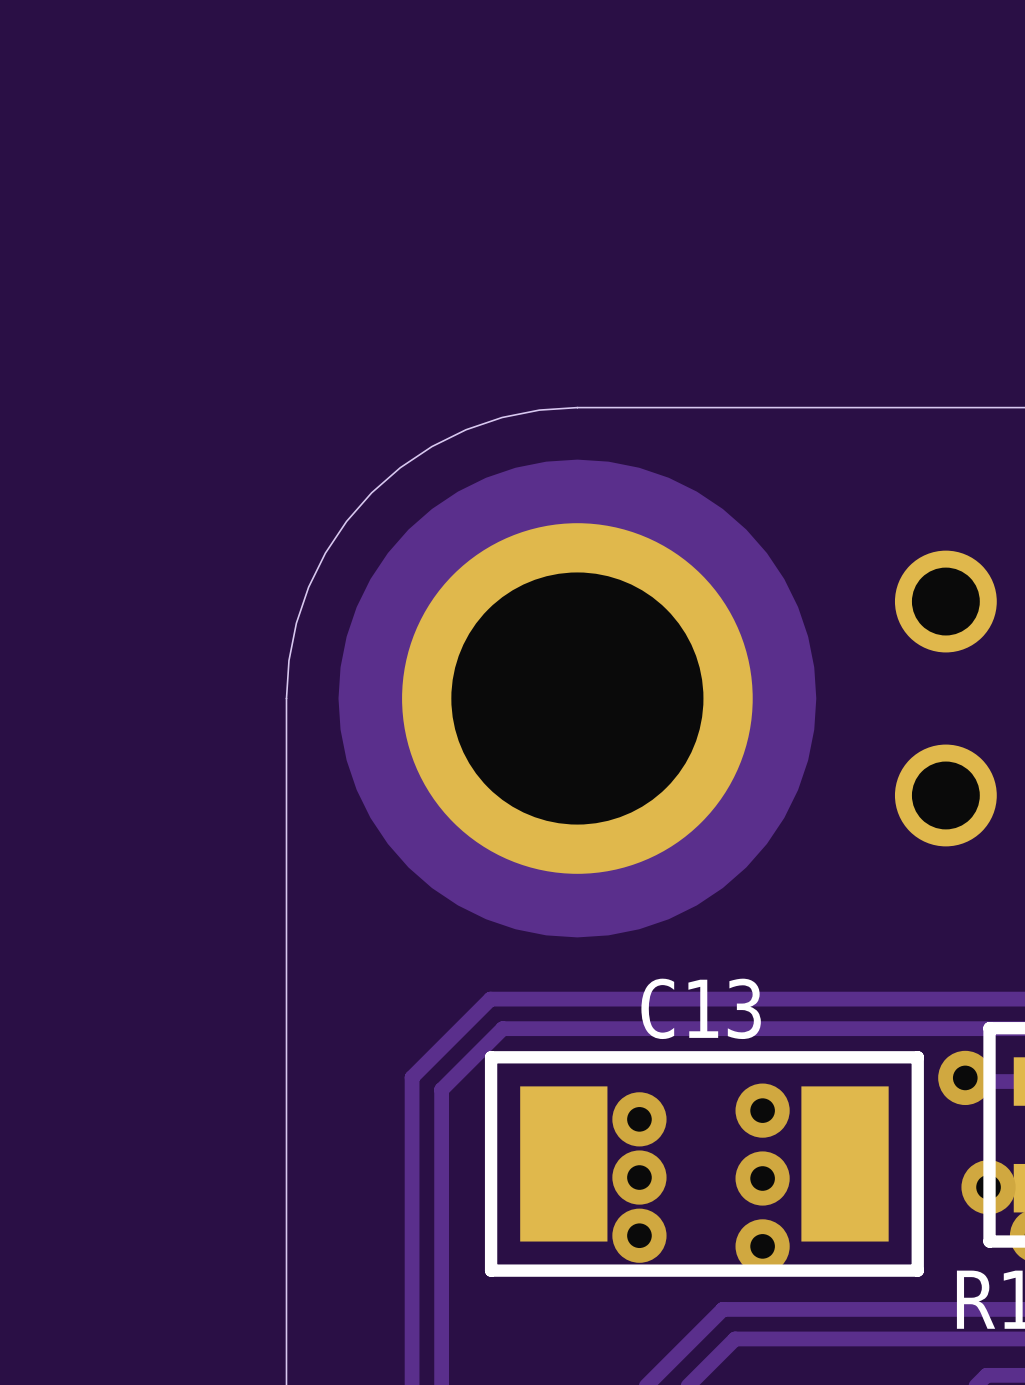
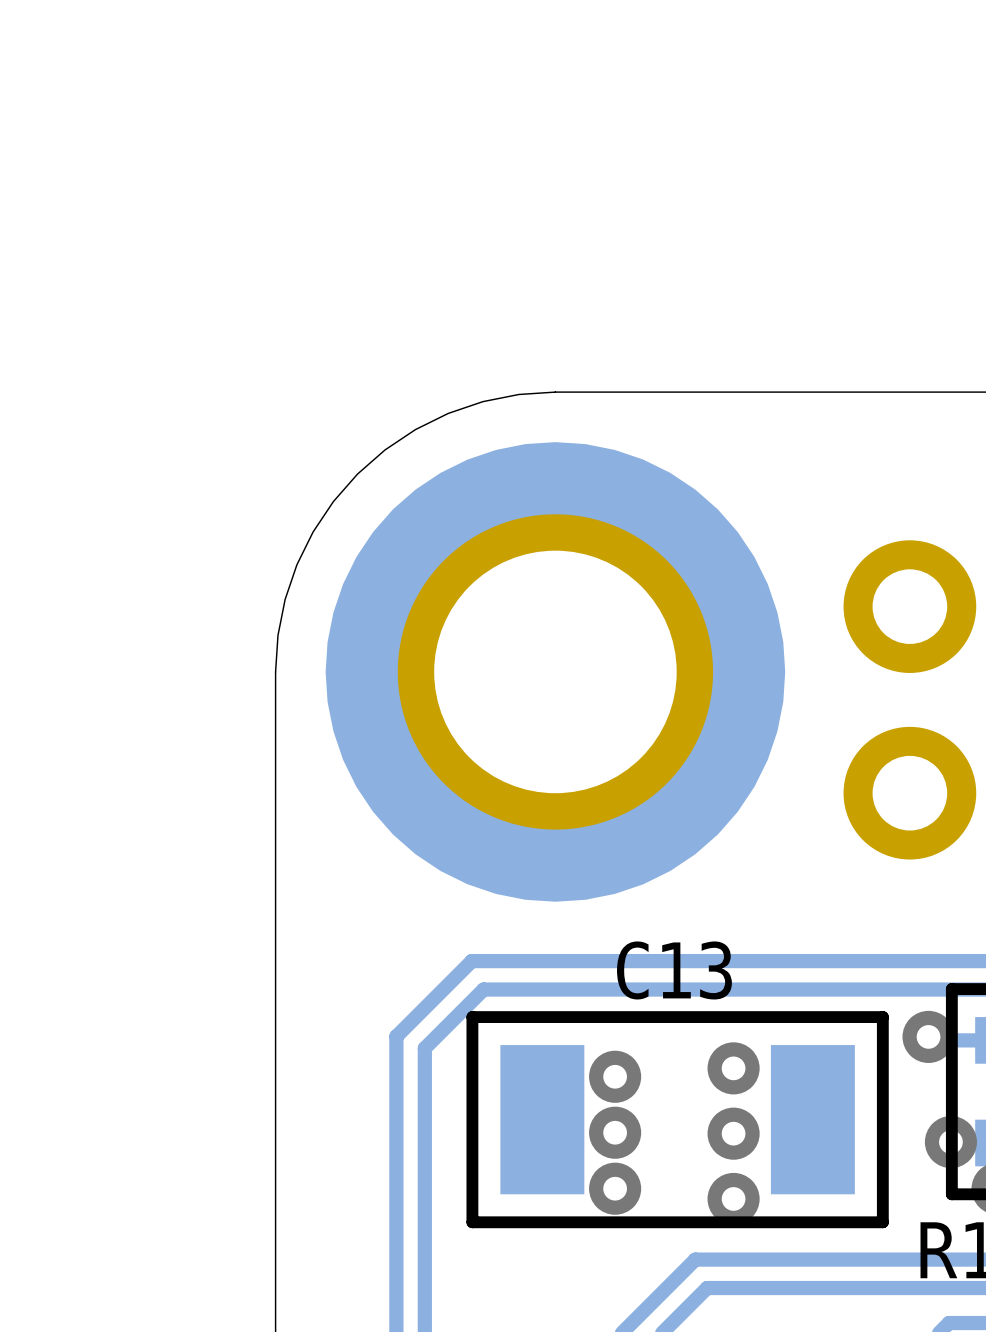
part footprint: [338, 459, 817, 938] -> [325, 442, 786, 902]
part: (945, 601) -> none
part: none -> (909, 699)
part: (945, 795) -> none

